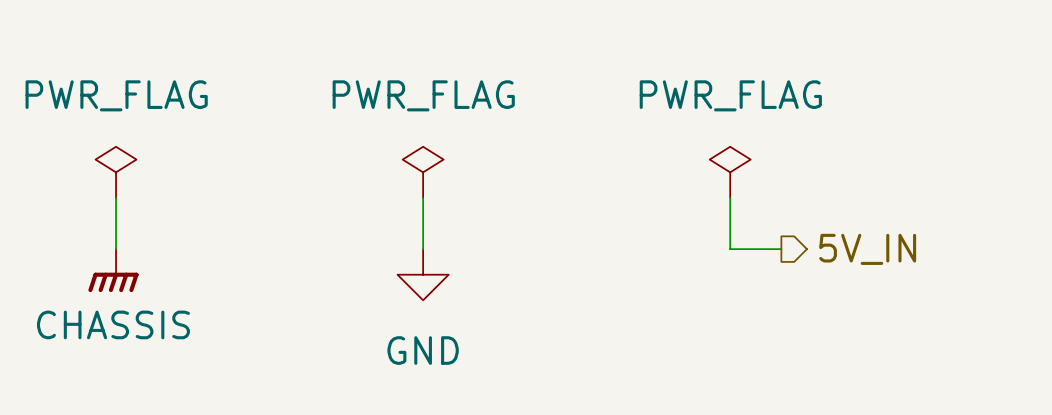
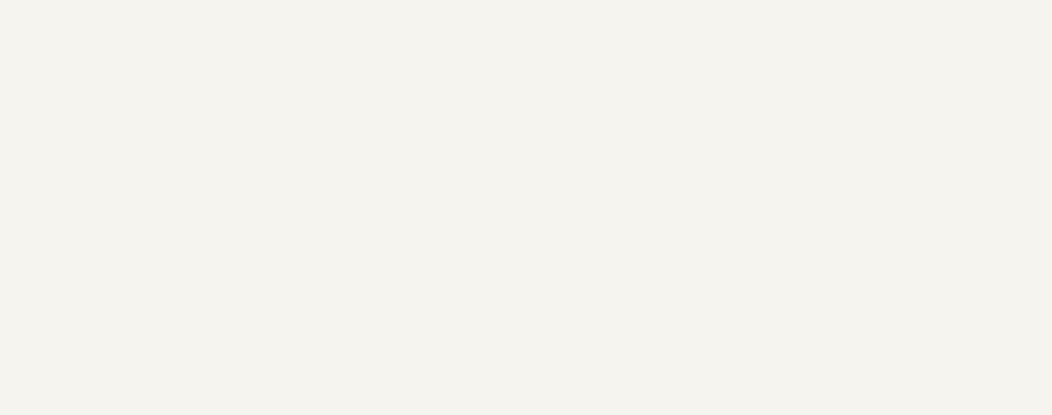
power symbol: PWR_FLAG (116, 172) -> none
power symbol: PWR_FLAG (423, 172) -> none
power symbol: PWR_FLAG (730, 172) -> none
wire: (116, 197) (116, 249) -> none
wire: (423, 197) (423, 249) -> none
wire: (730, 197) (730, 249) (781, 249) -> none
hierarchical label: 5V_IN (867, 249) -> none
power symbol: CHASSIS (113, 270) -> none
power symbol: GND (423, 274) -> none

